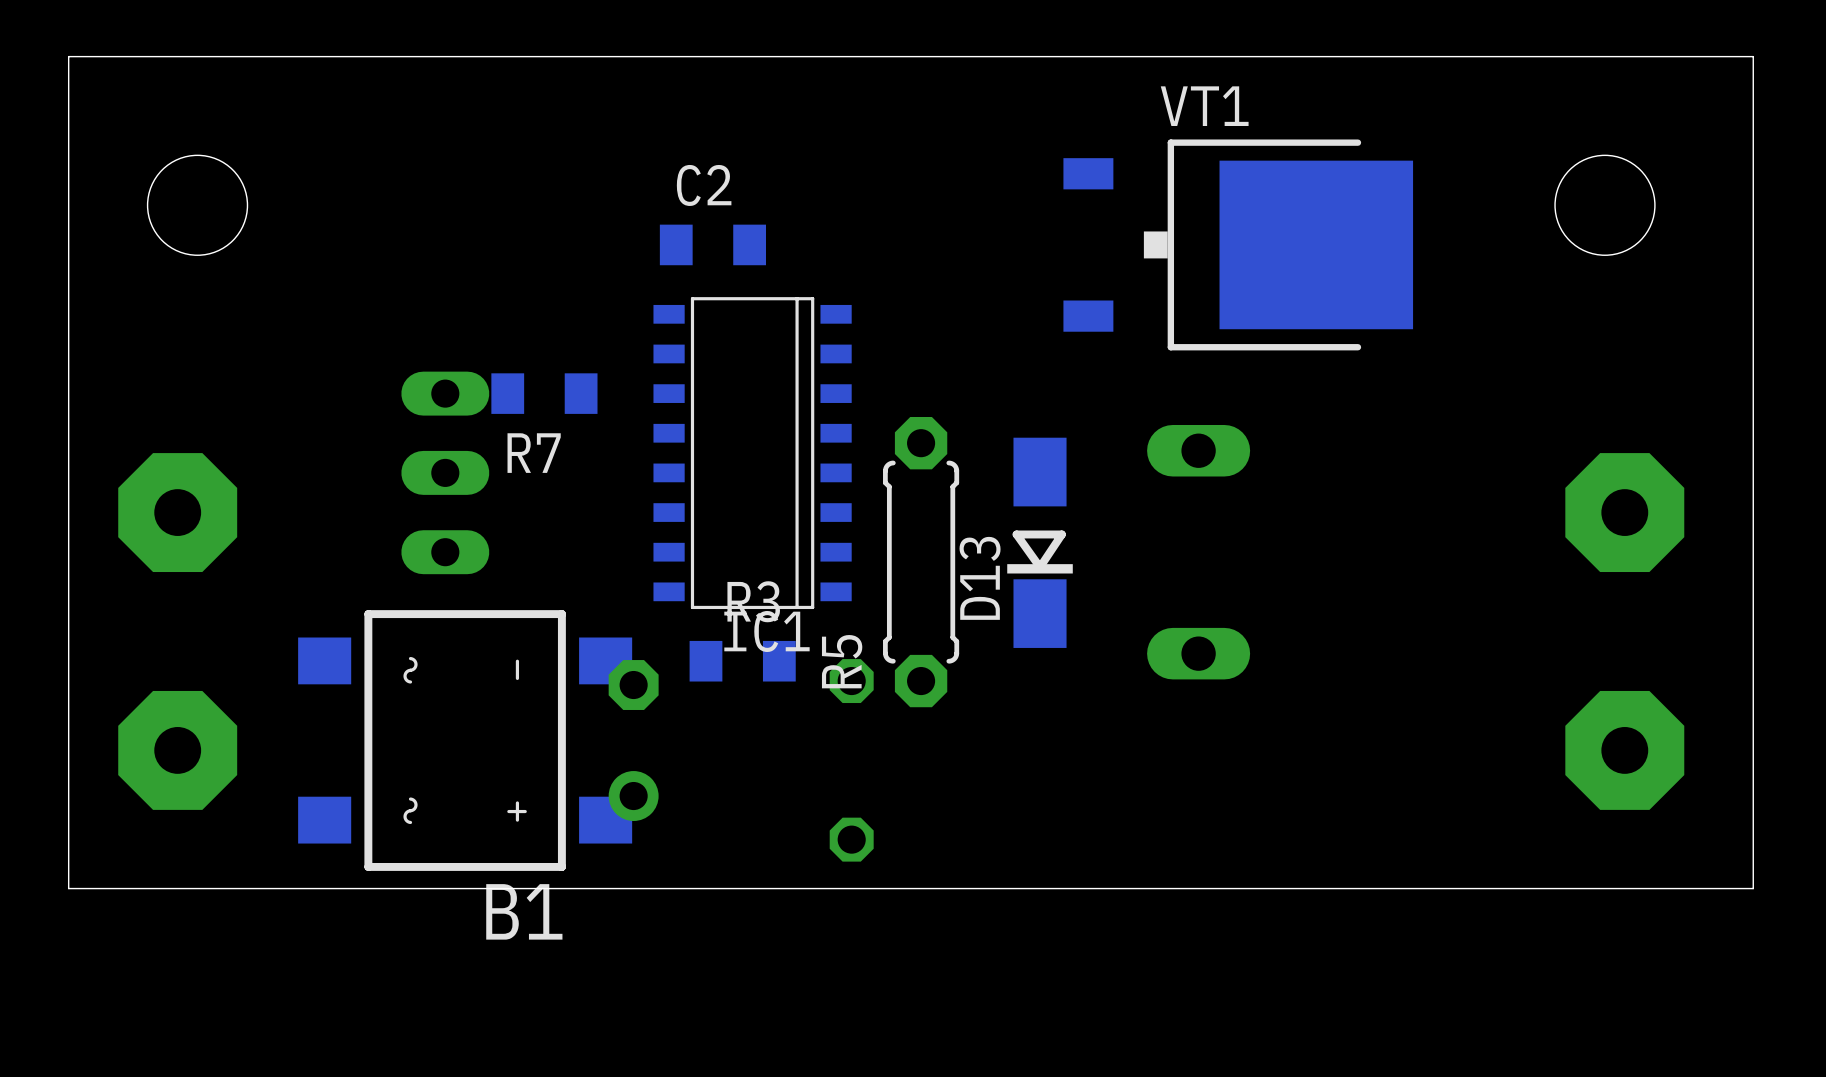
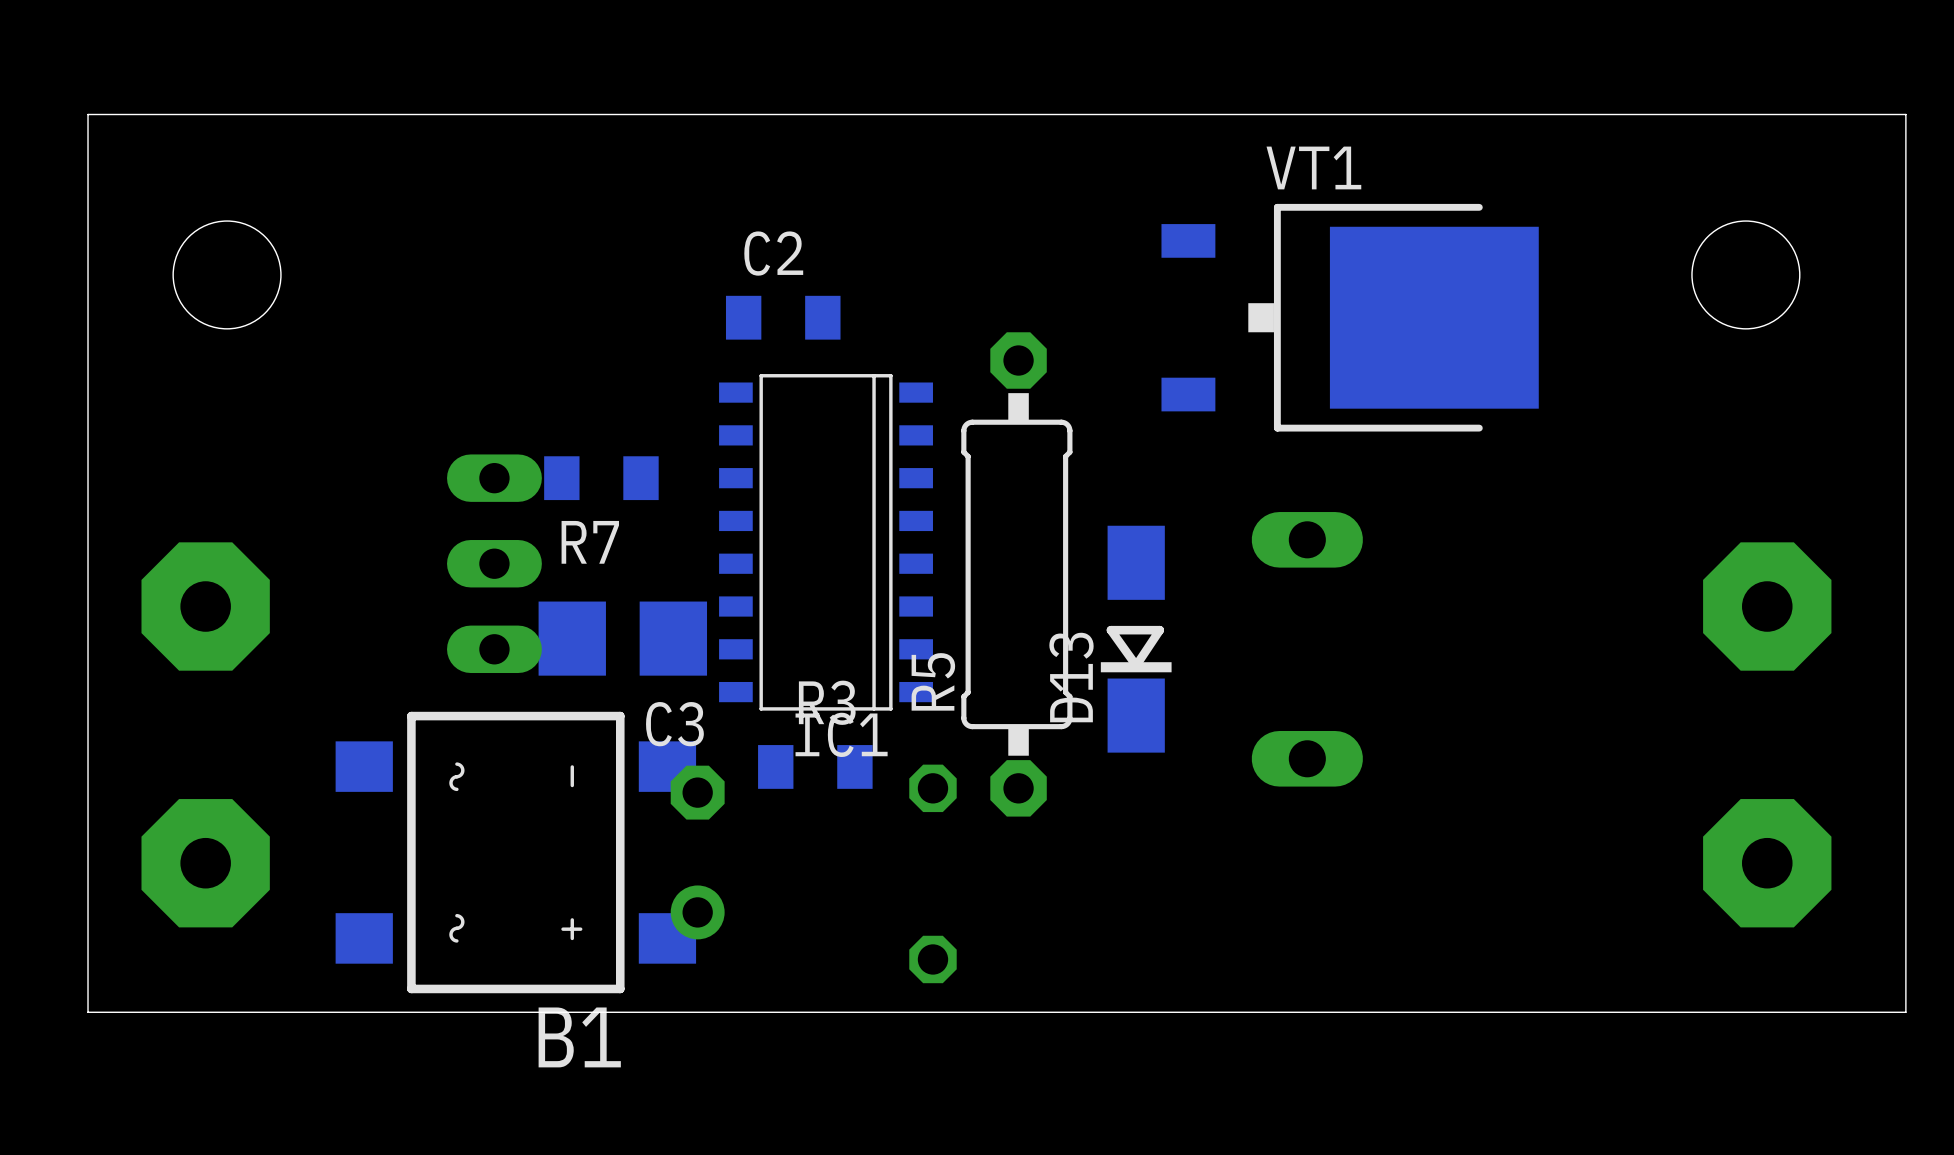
R5 footprint: [883, 417, 960, 708] -> [961, 332, 1073, 817]
C3: none -> (622, 638)

